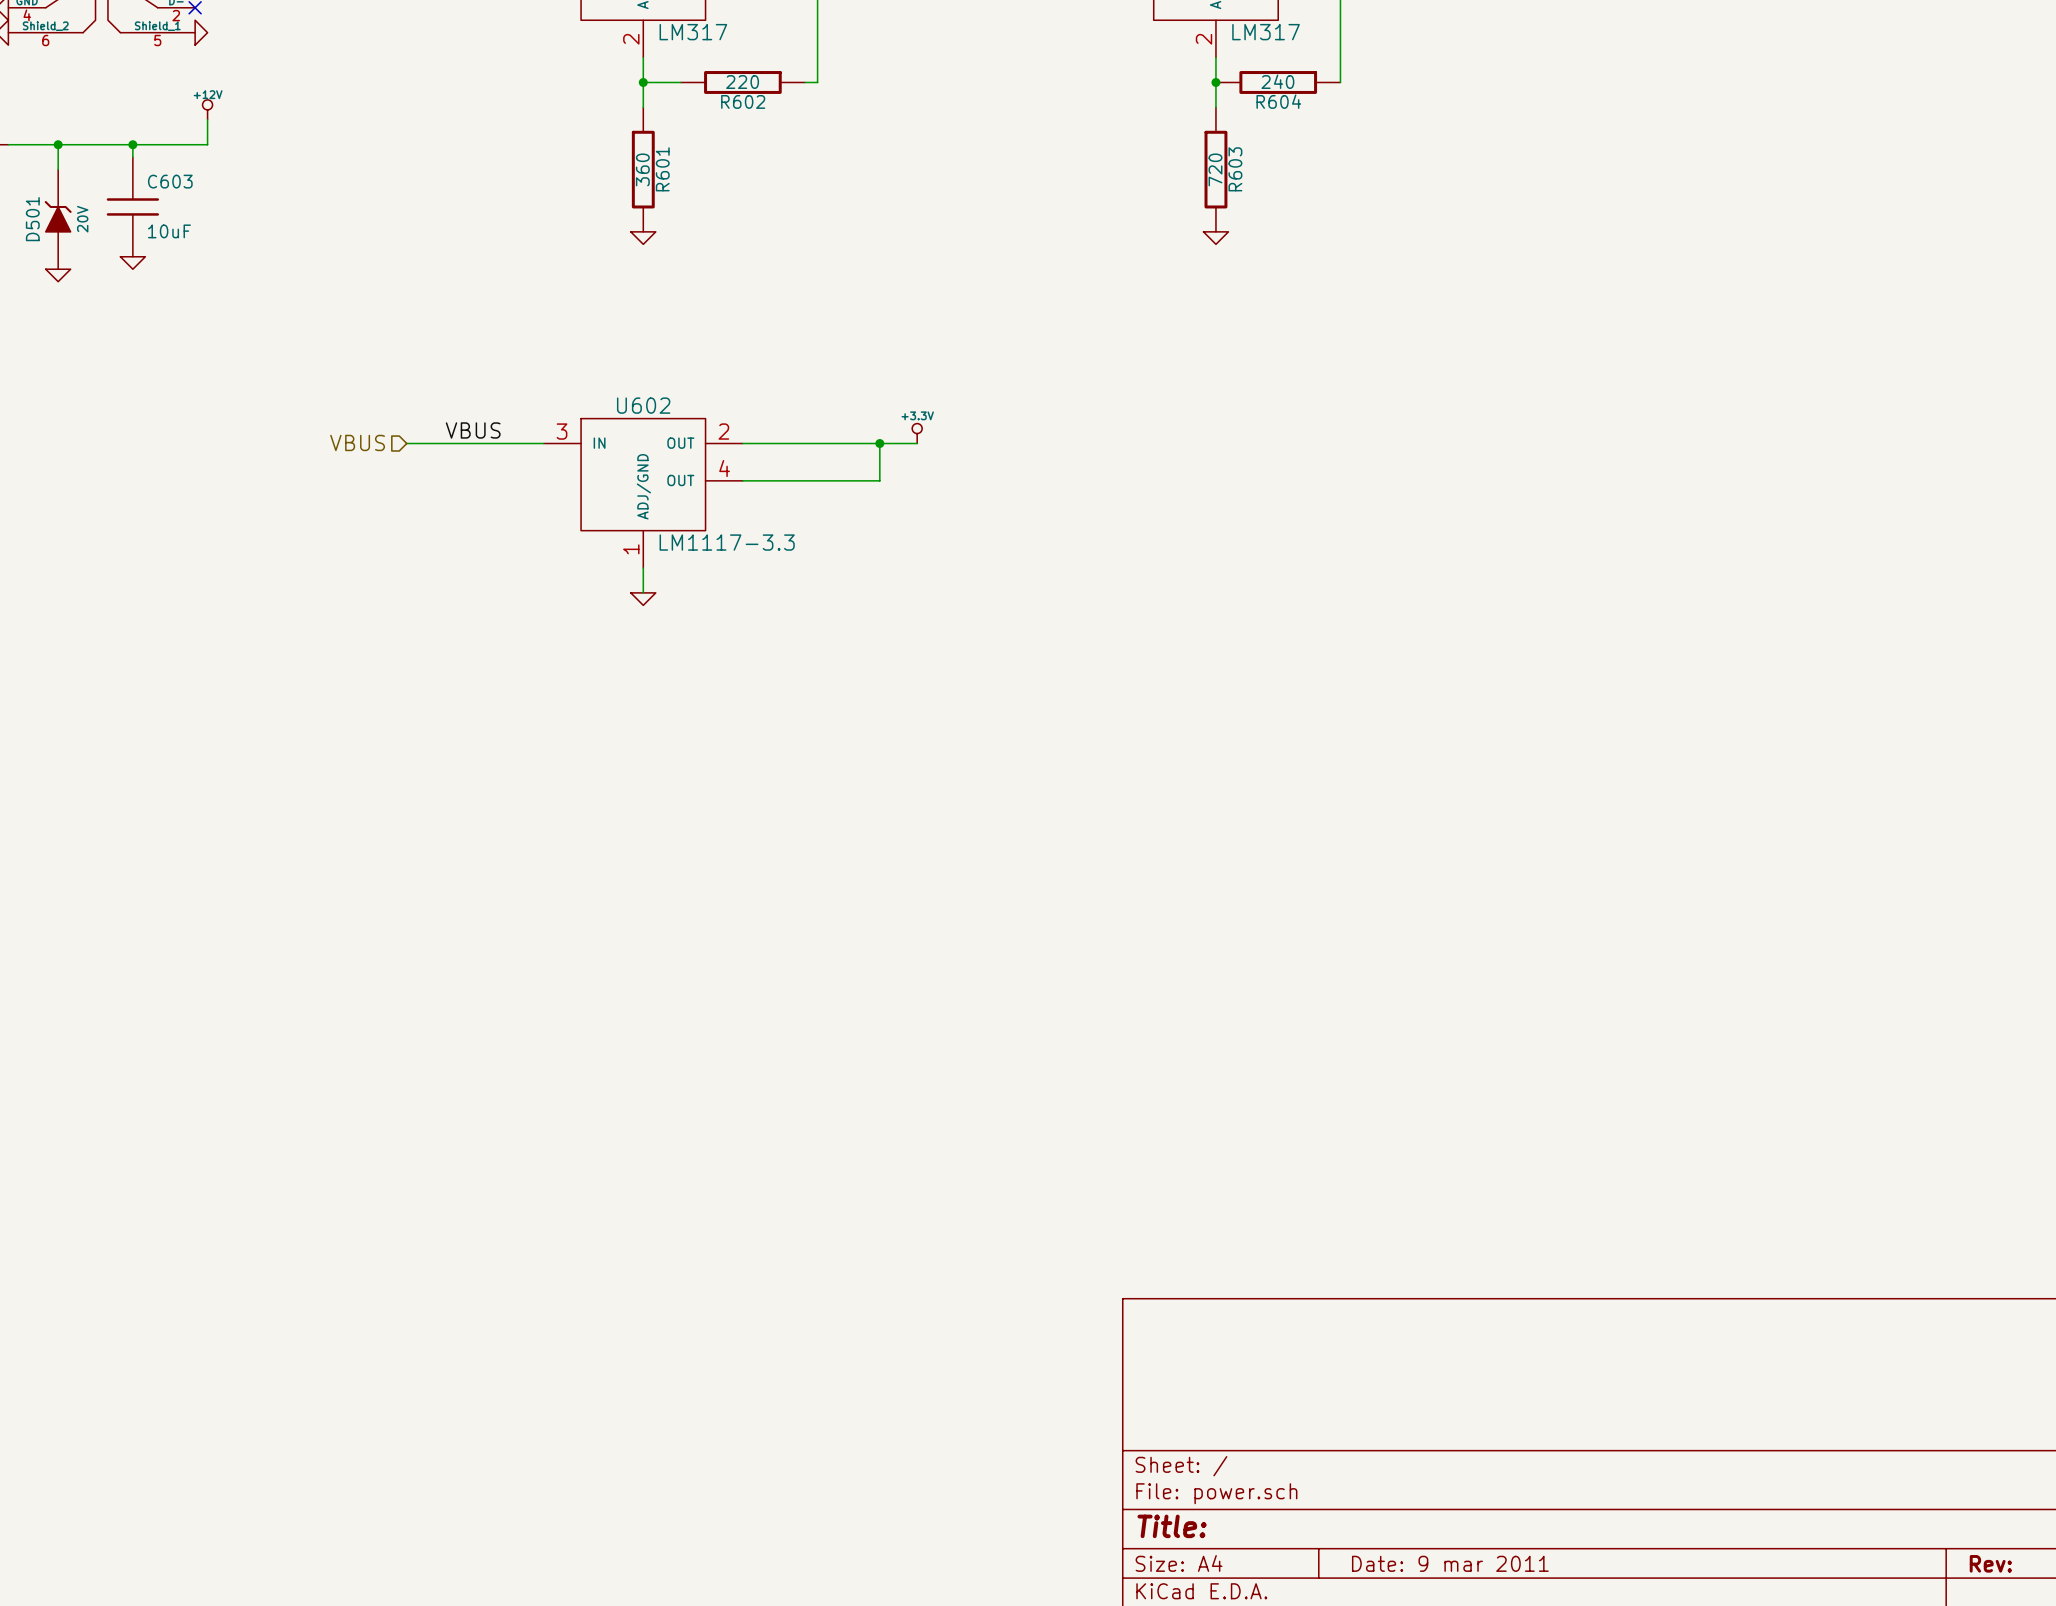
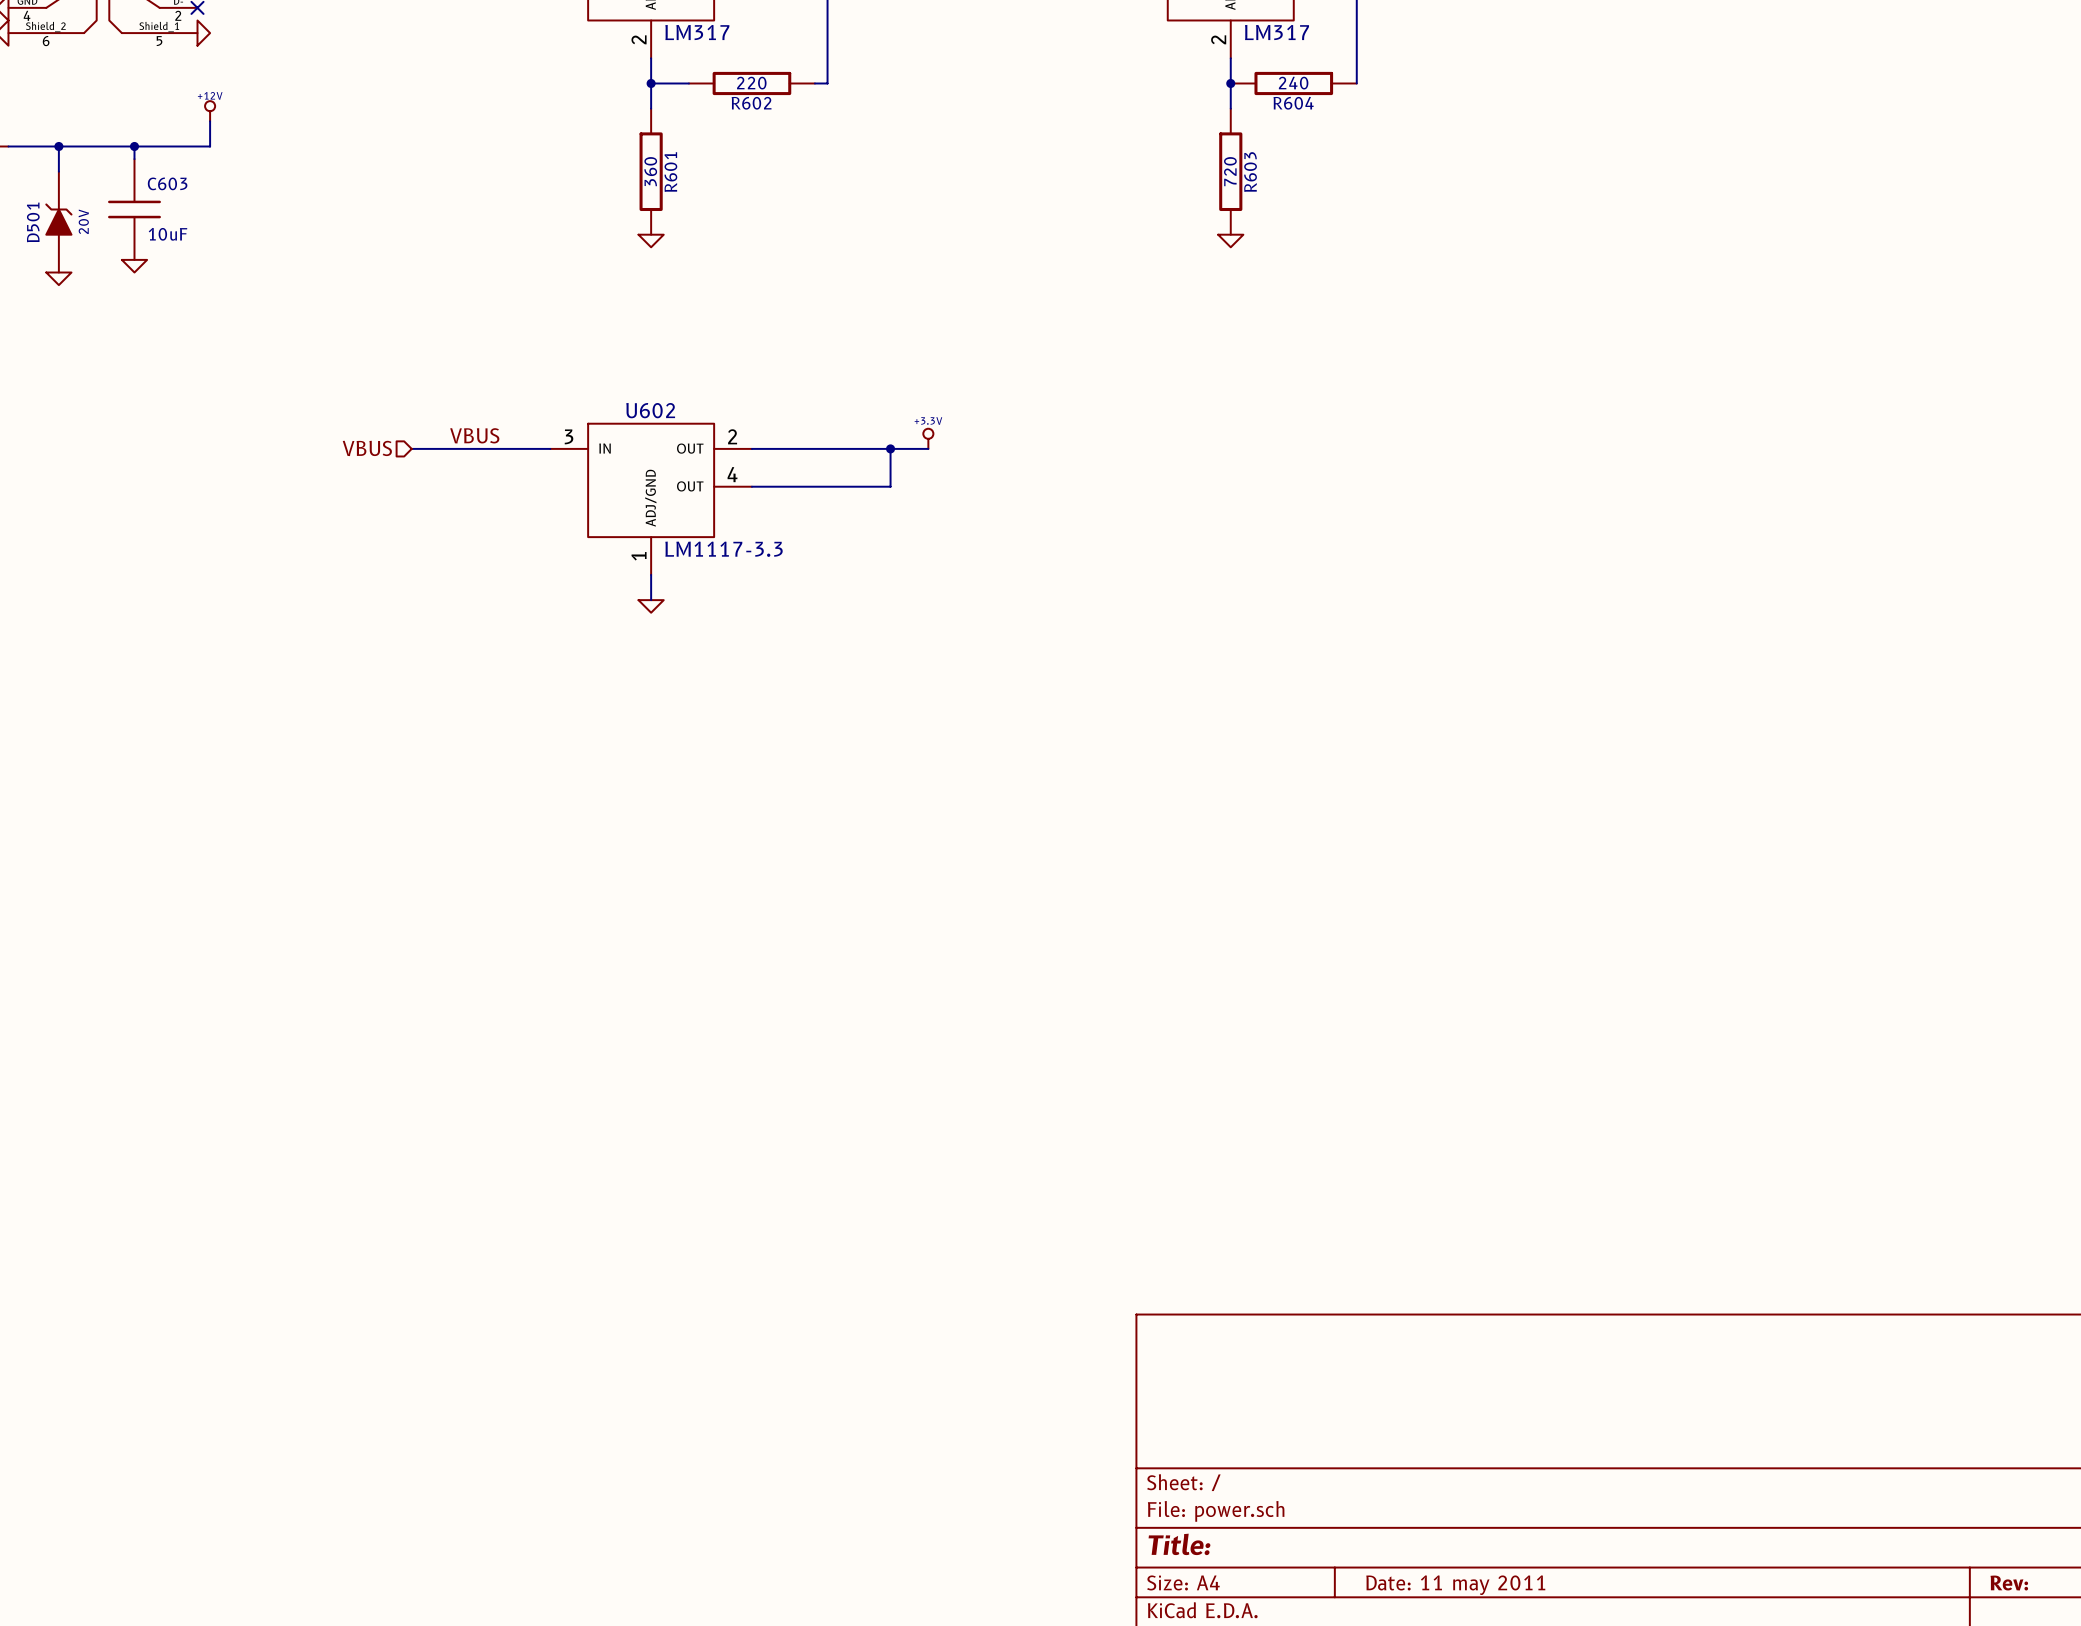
title block: Date: 9 mar 2011 (1450, 1563) -> Date: 11 may 2011 (1455, 1585)

